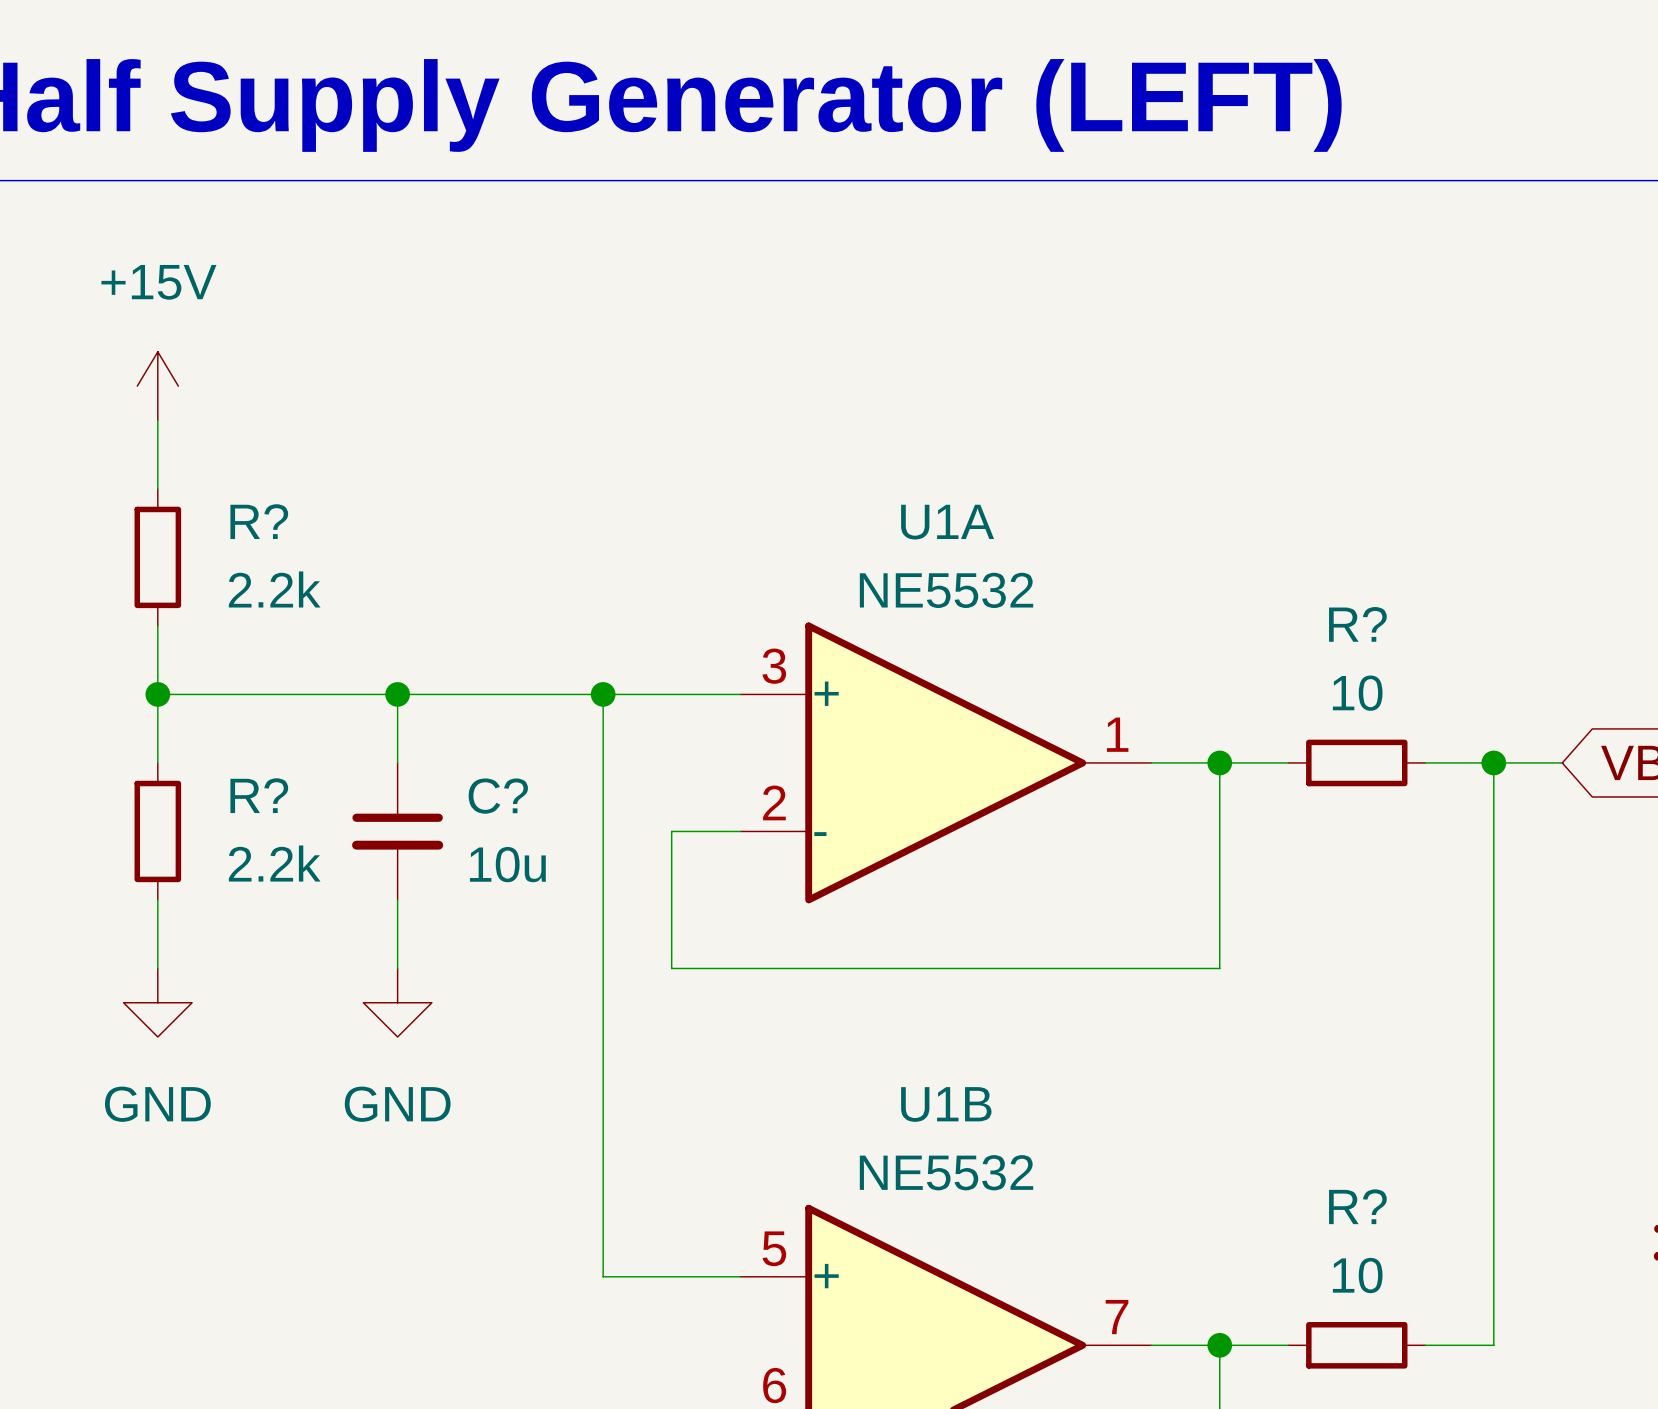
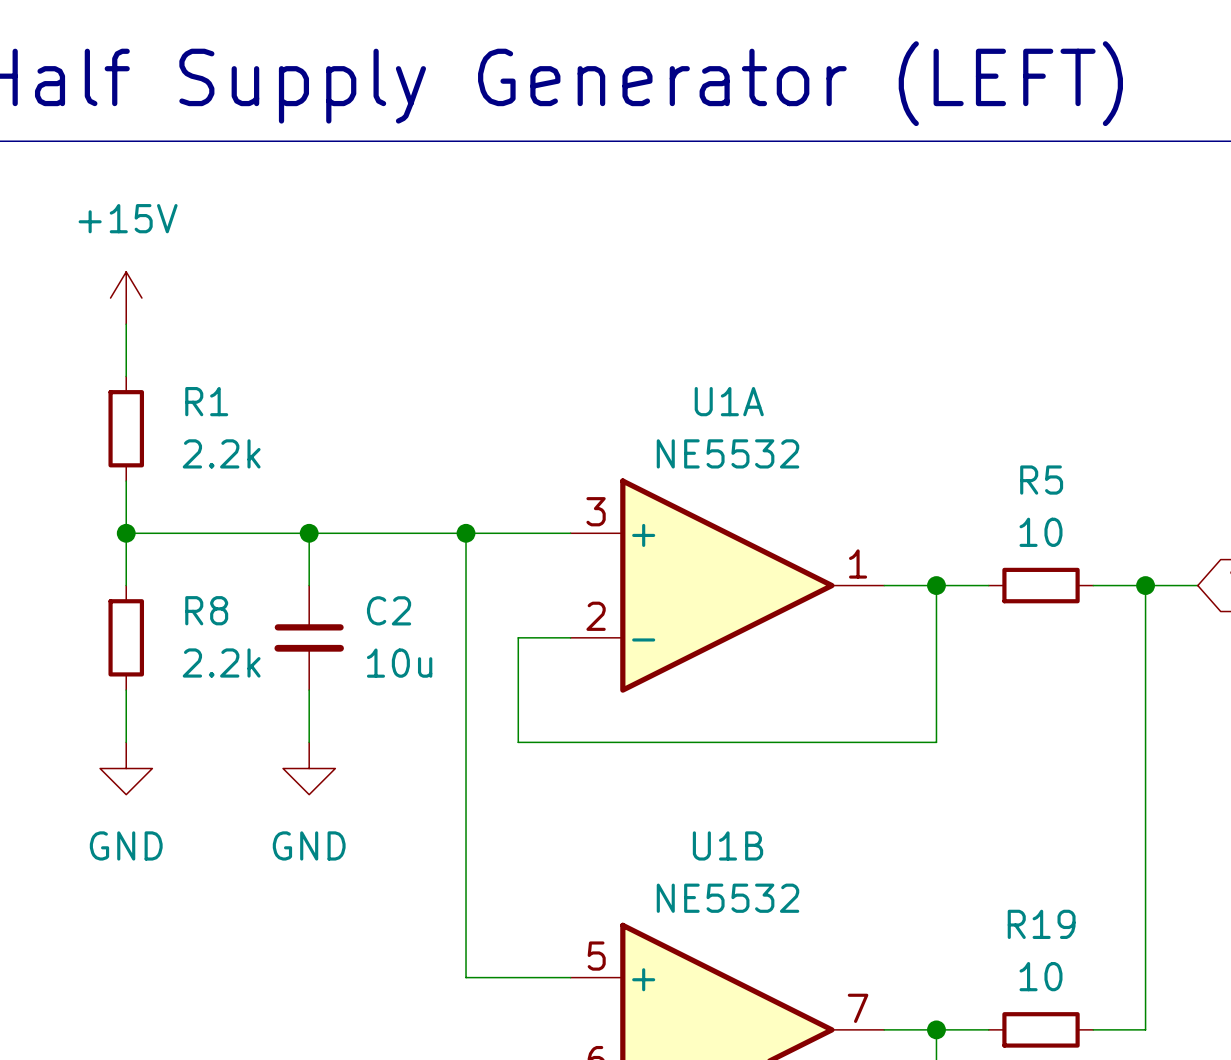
R? name: R? (259, 521) -> R1 (206, 401)
R? name: R? (1357, 624) -> R5 (1041, 480)
R? name: R? (259, 795) -> R8 (206, 610)
C? name: C? (498, 796) -> C2 (389, 610)
R? name: R? (1357, 1206) -> R19 (1041, 924)

